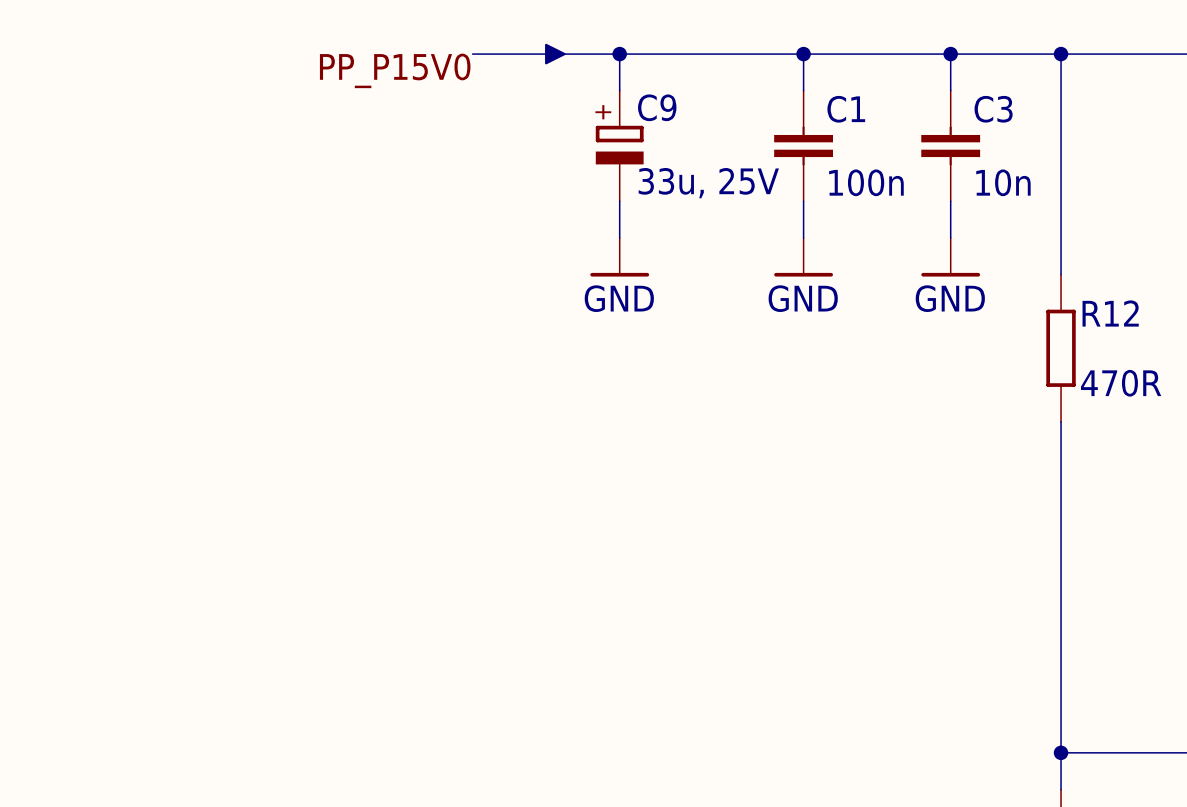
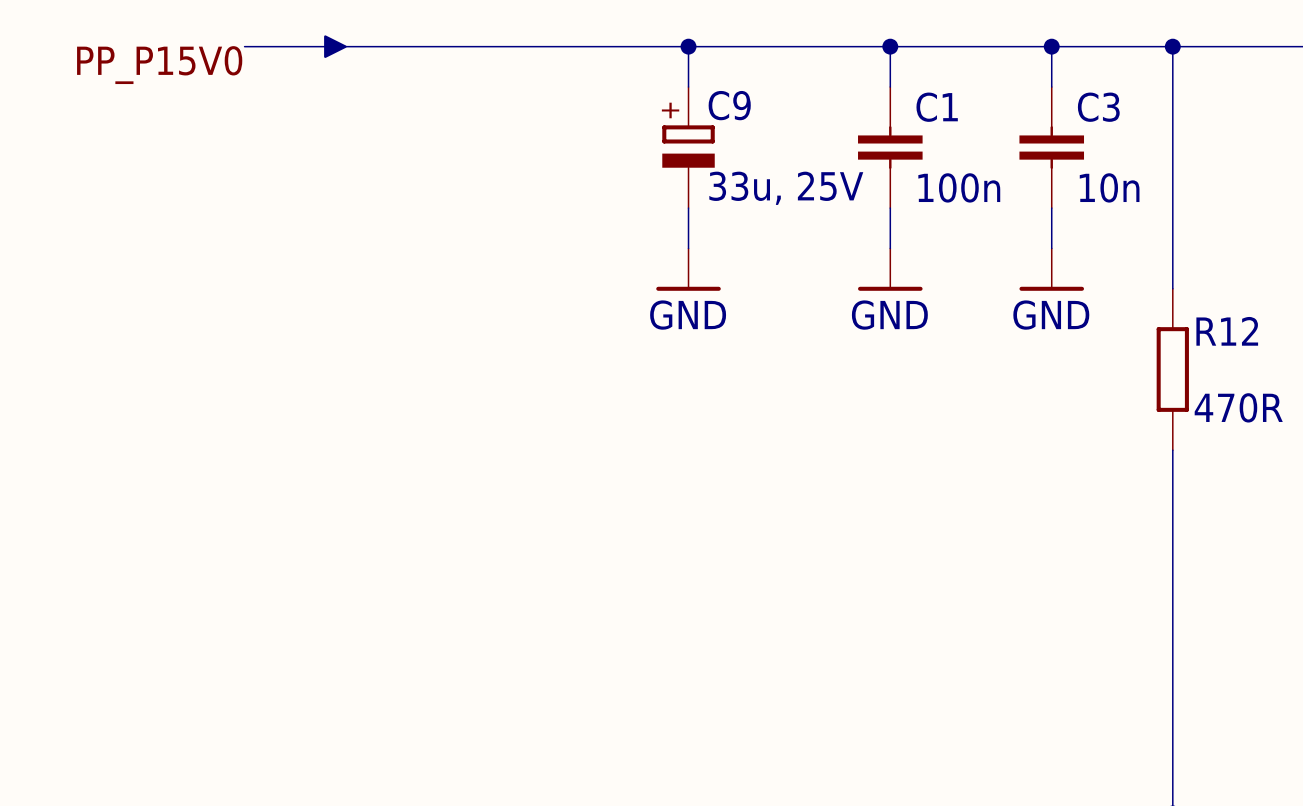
wire: none -> (244, 46) (527, 46)
part position: (555, 54) -> (335, 46)
label position: PP_P15V0 (395, 70) -> PP_P15V0 (159, 65)

